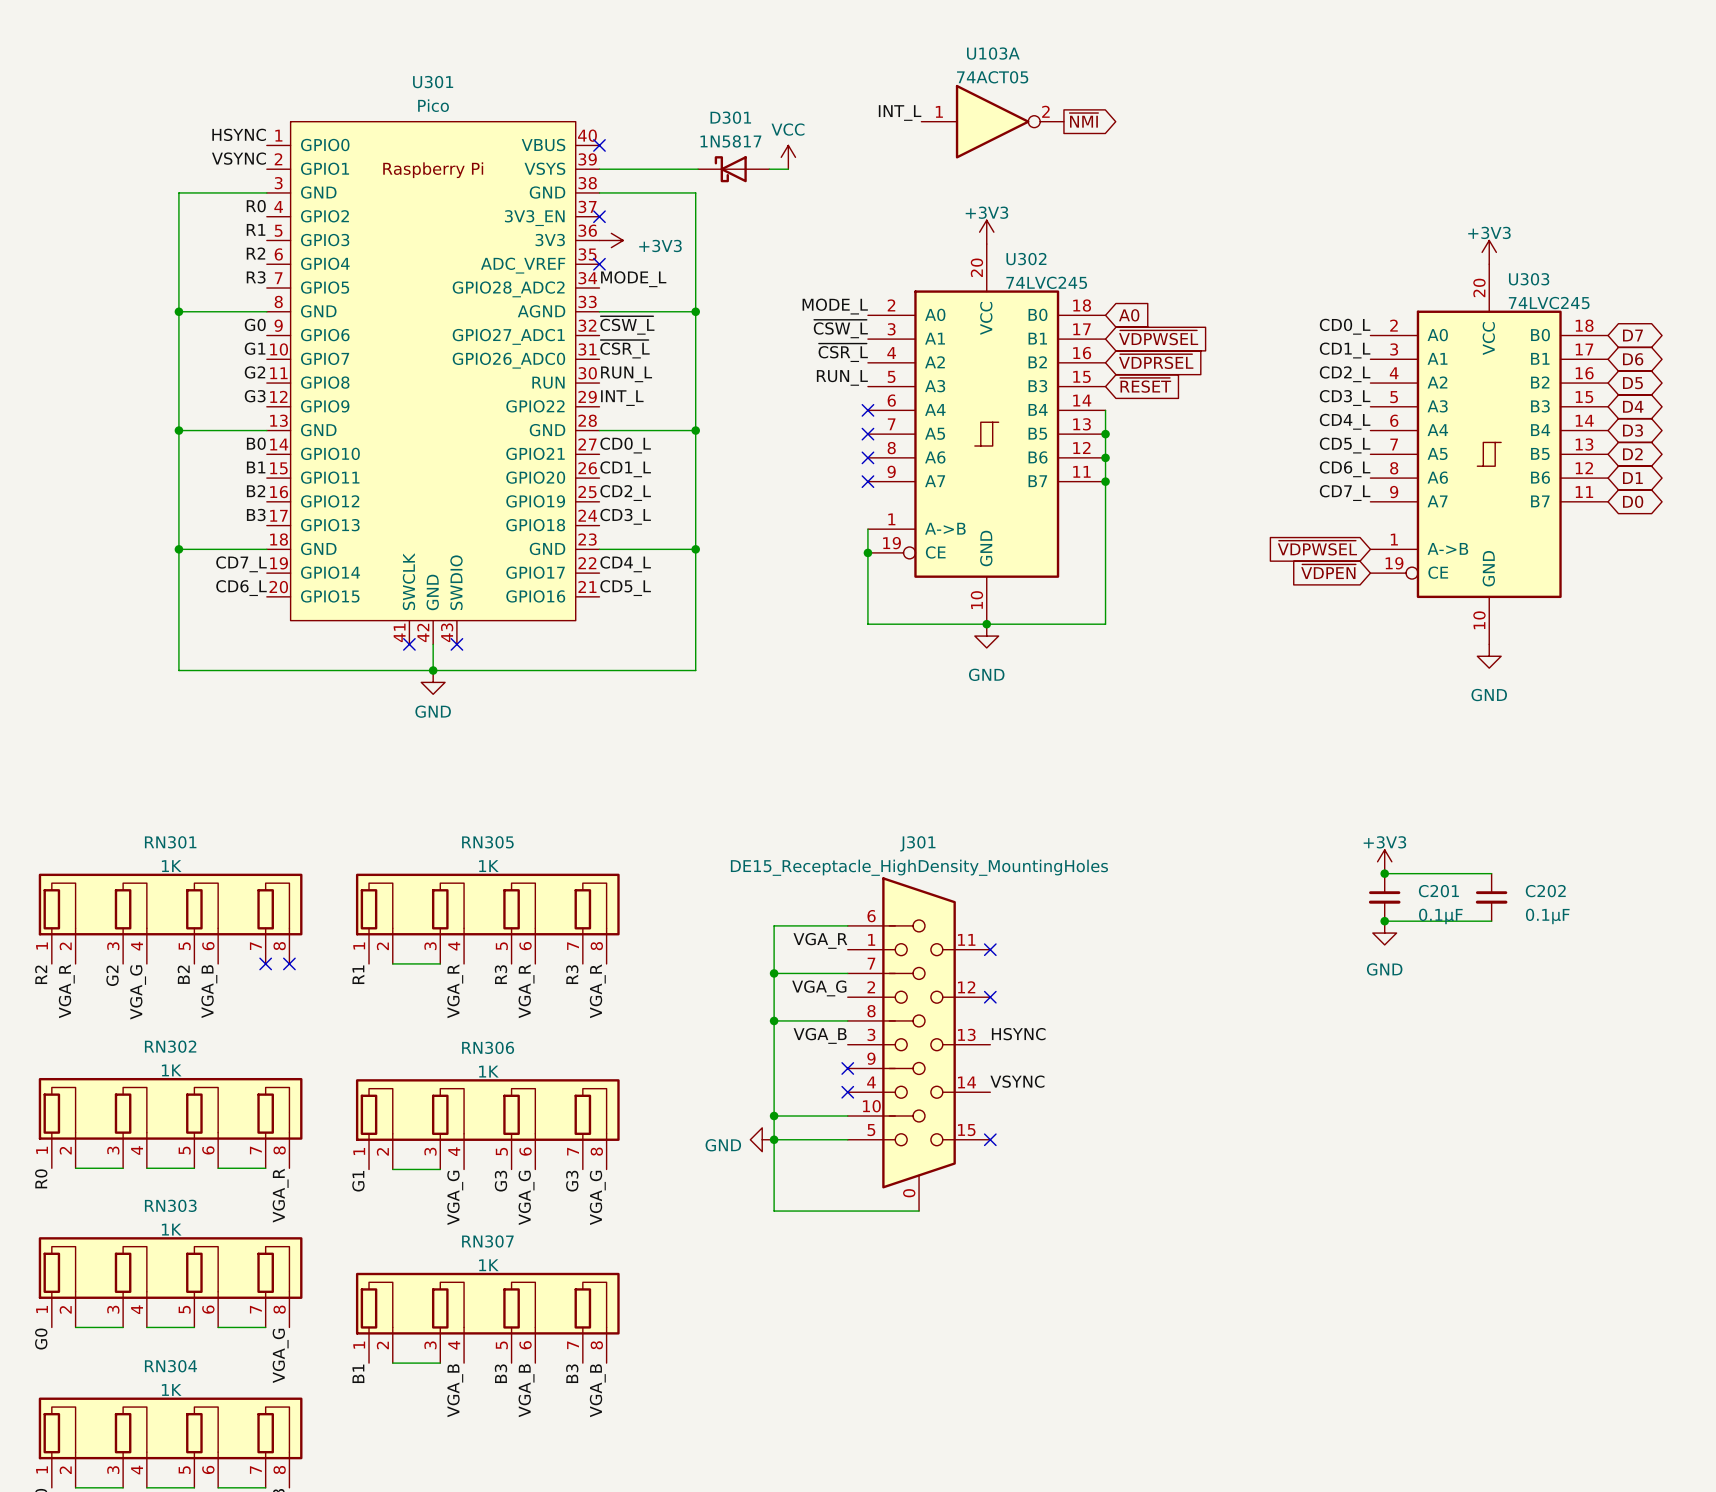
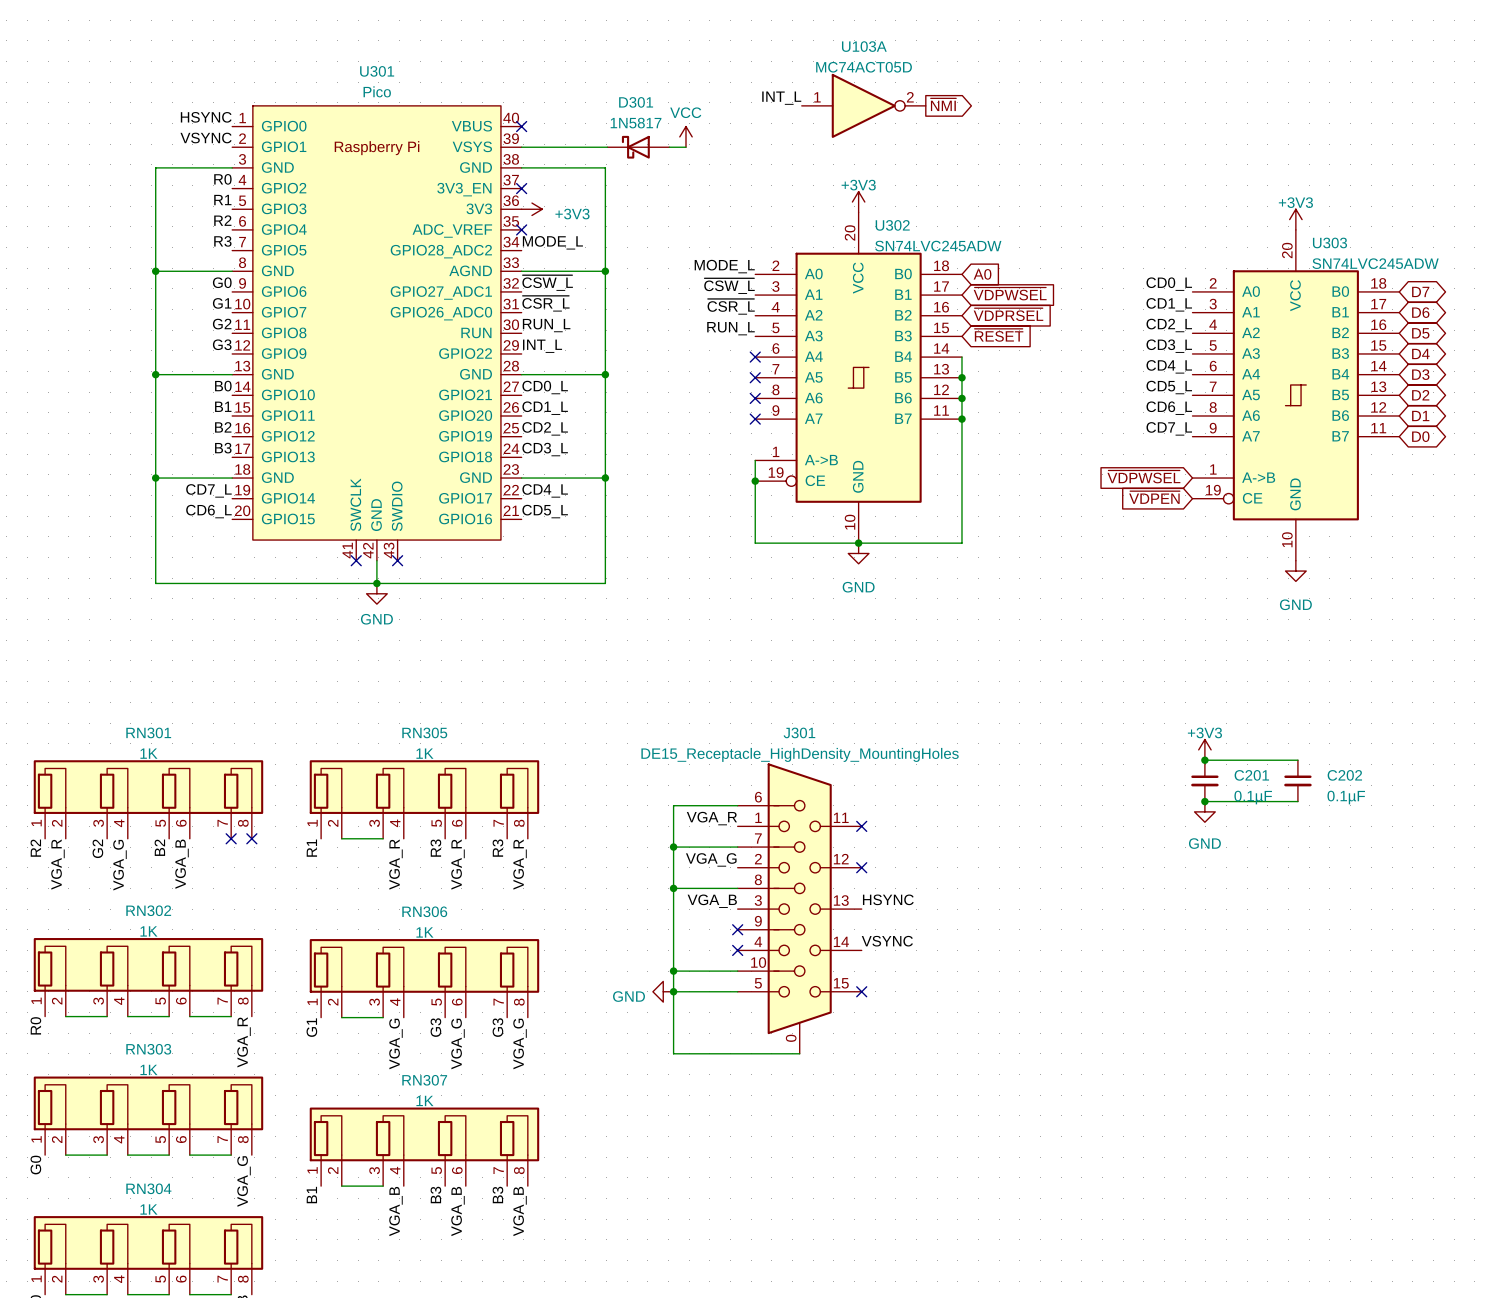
U103A value: 74ACT05 (992, 77) -> MC74ACT05D (864, 67)
U302 value: 74LVC245 (1046, 282) -> SN74LVC245ADW (938, 246)
U303 value: 74LVC245 (1549, 303) -> SN74LVC245ADW (1375, 263)

